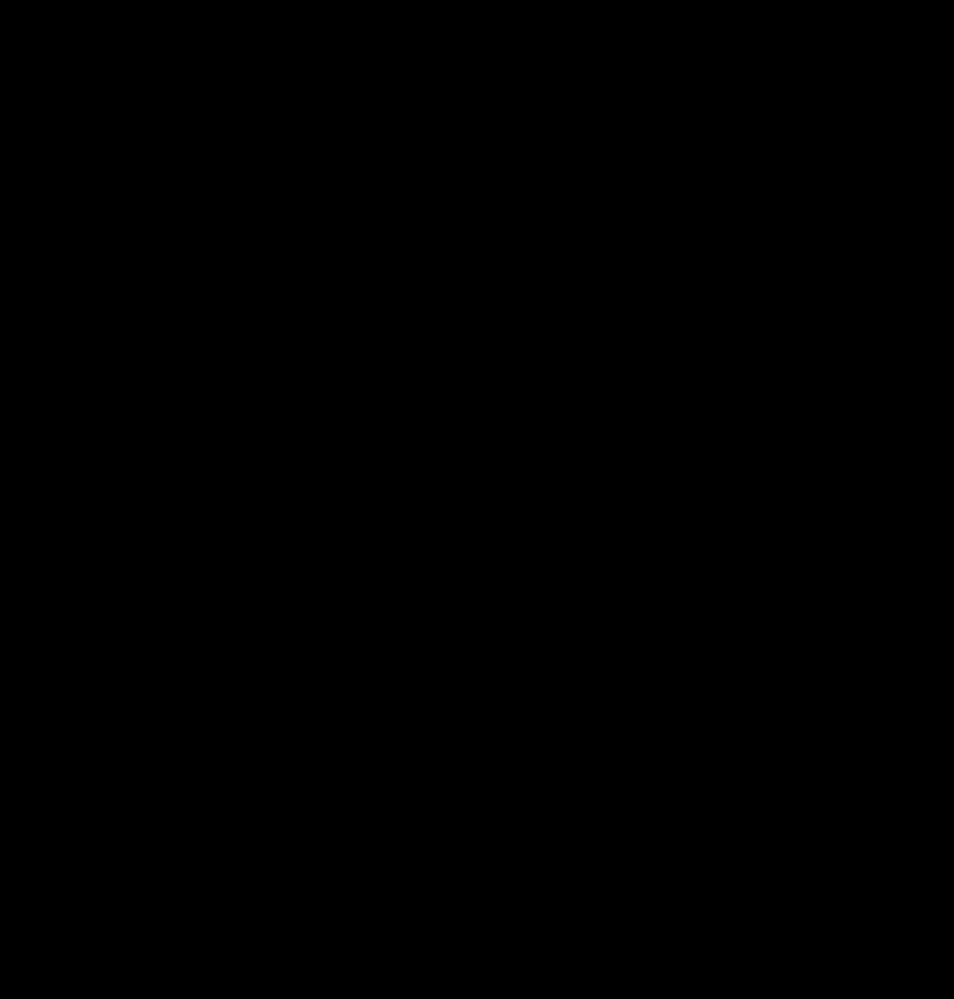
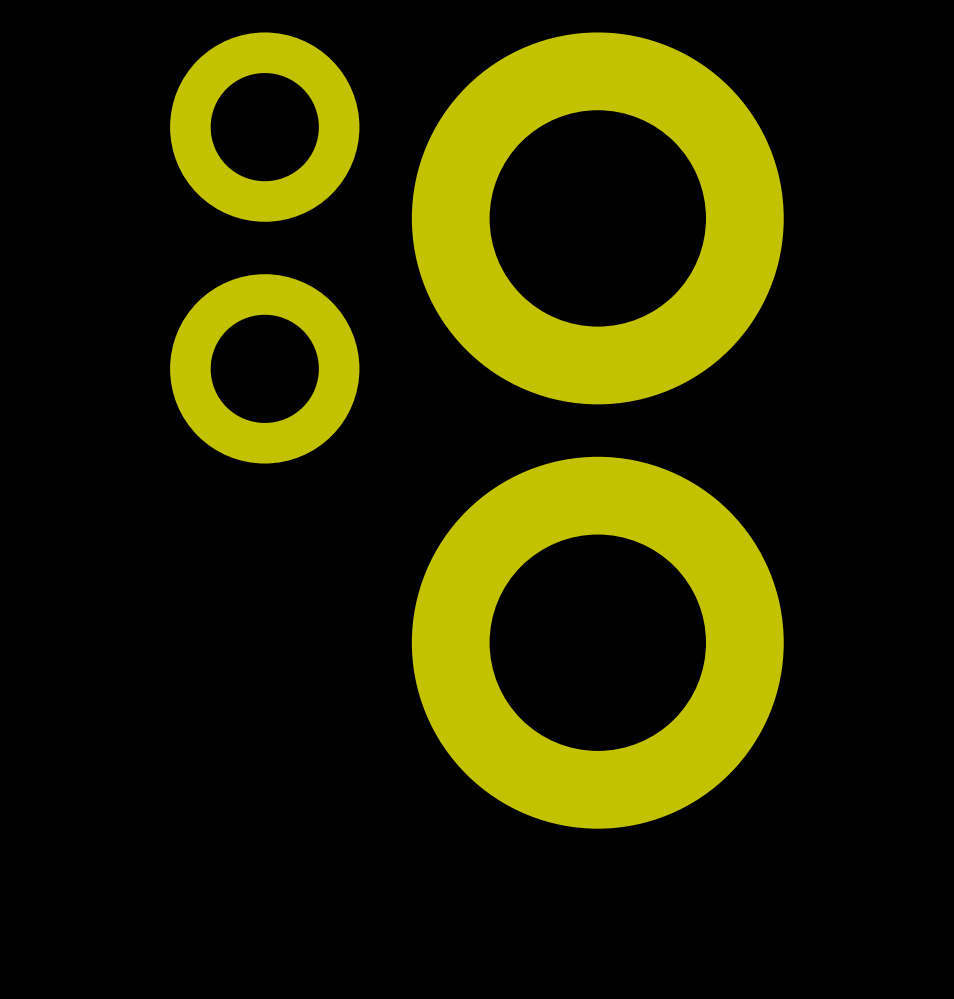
part: none -> (264, 127)
part: none -> (597, 218)
part: none -> (264, 368)
part: none -> (597, 642)

